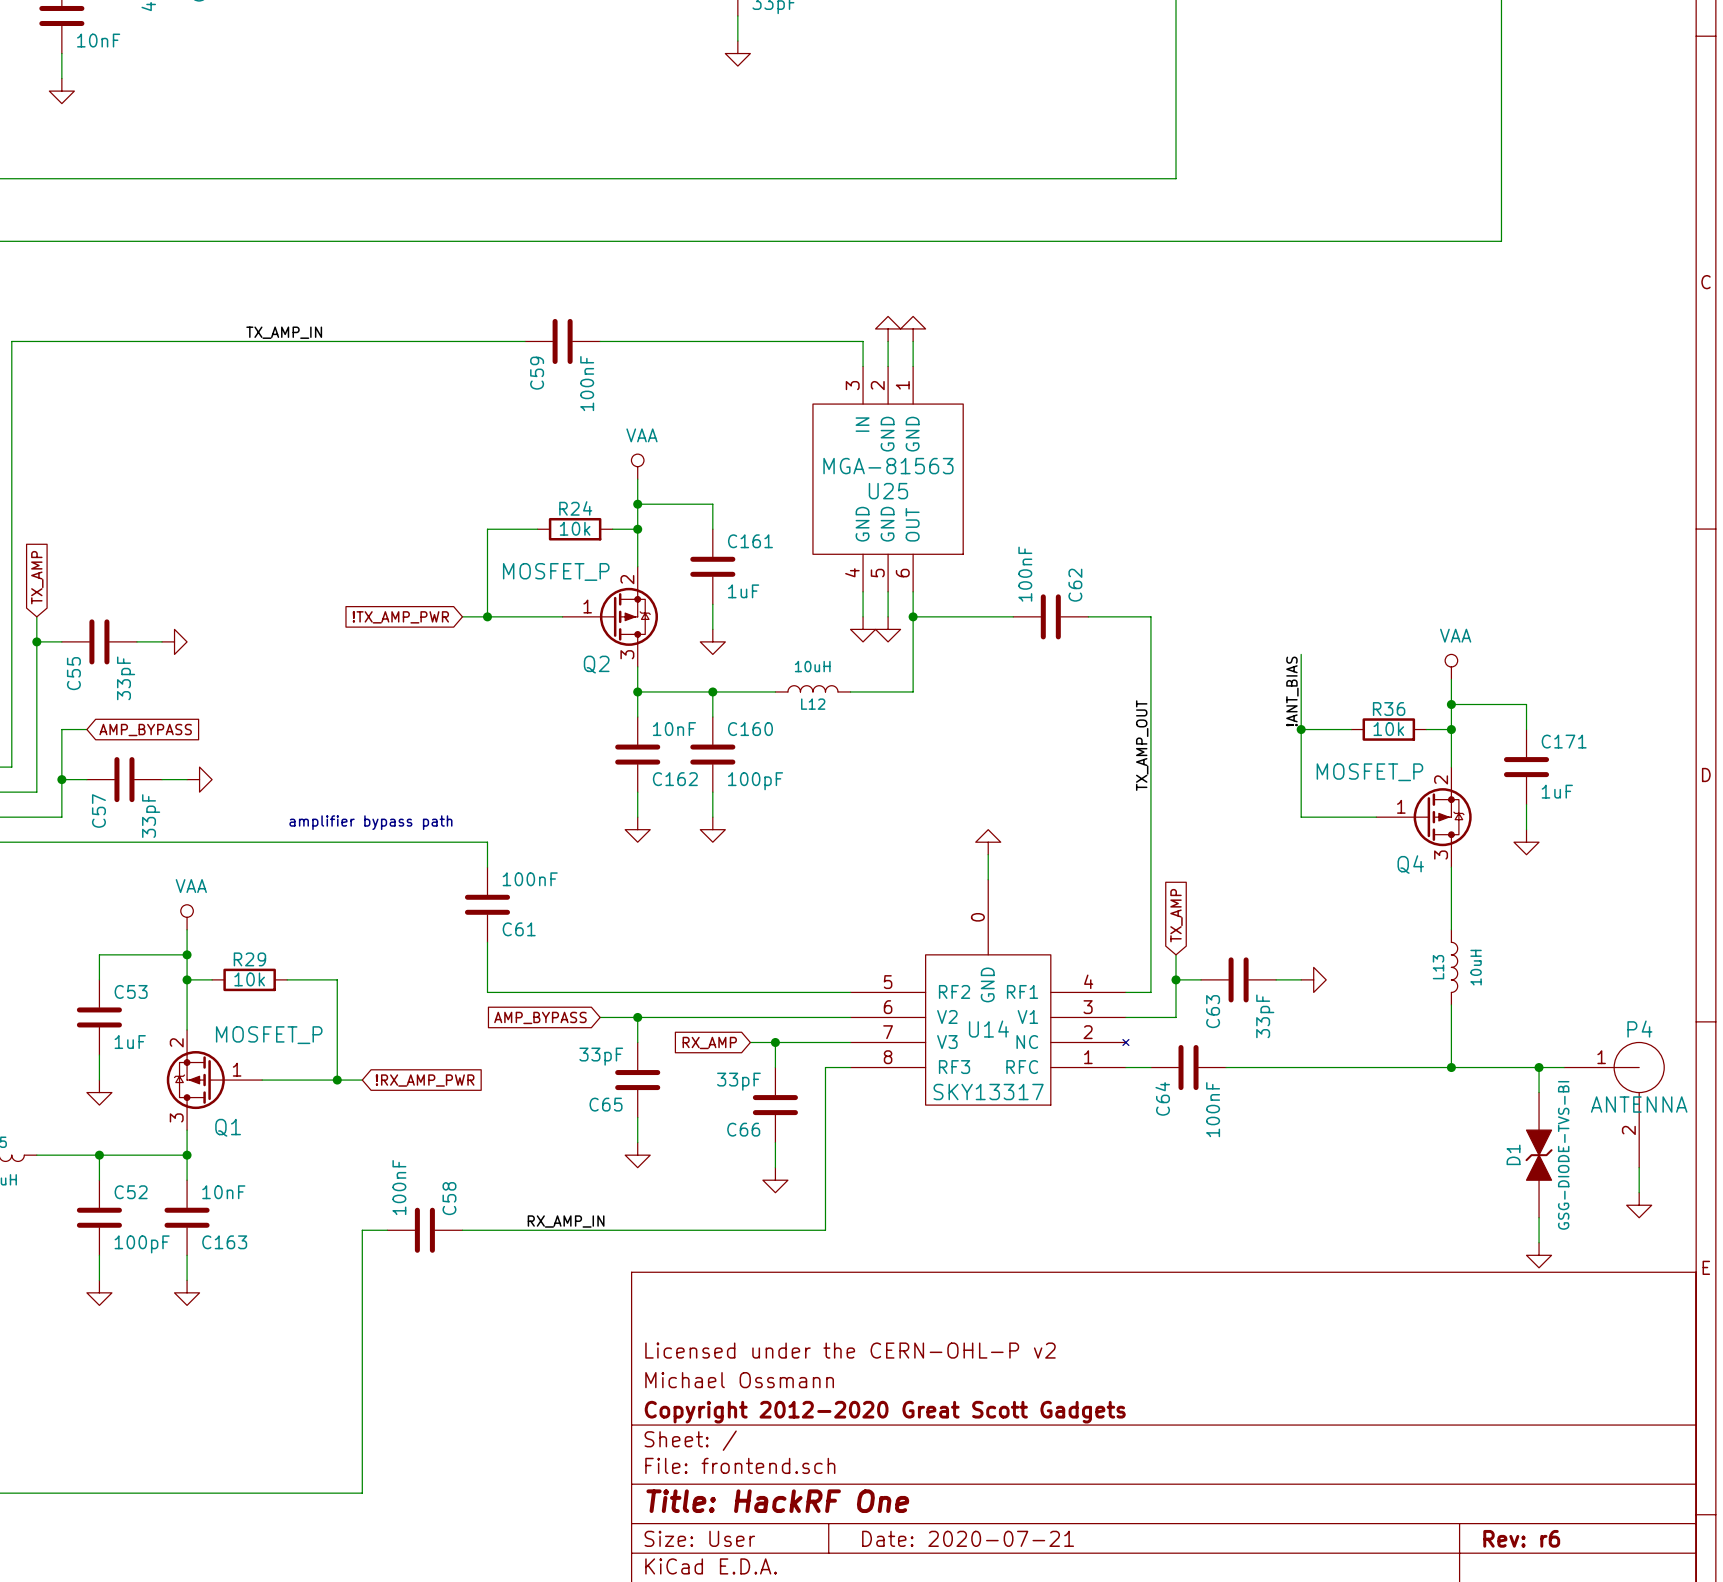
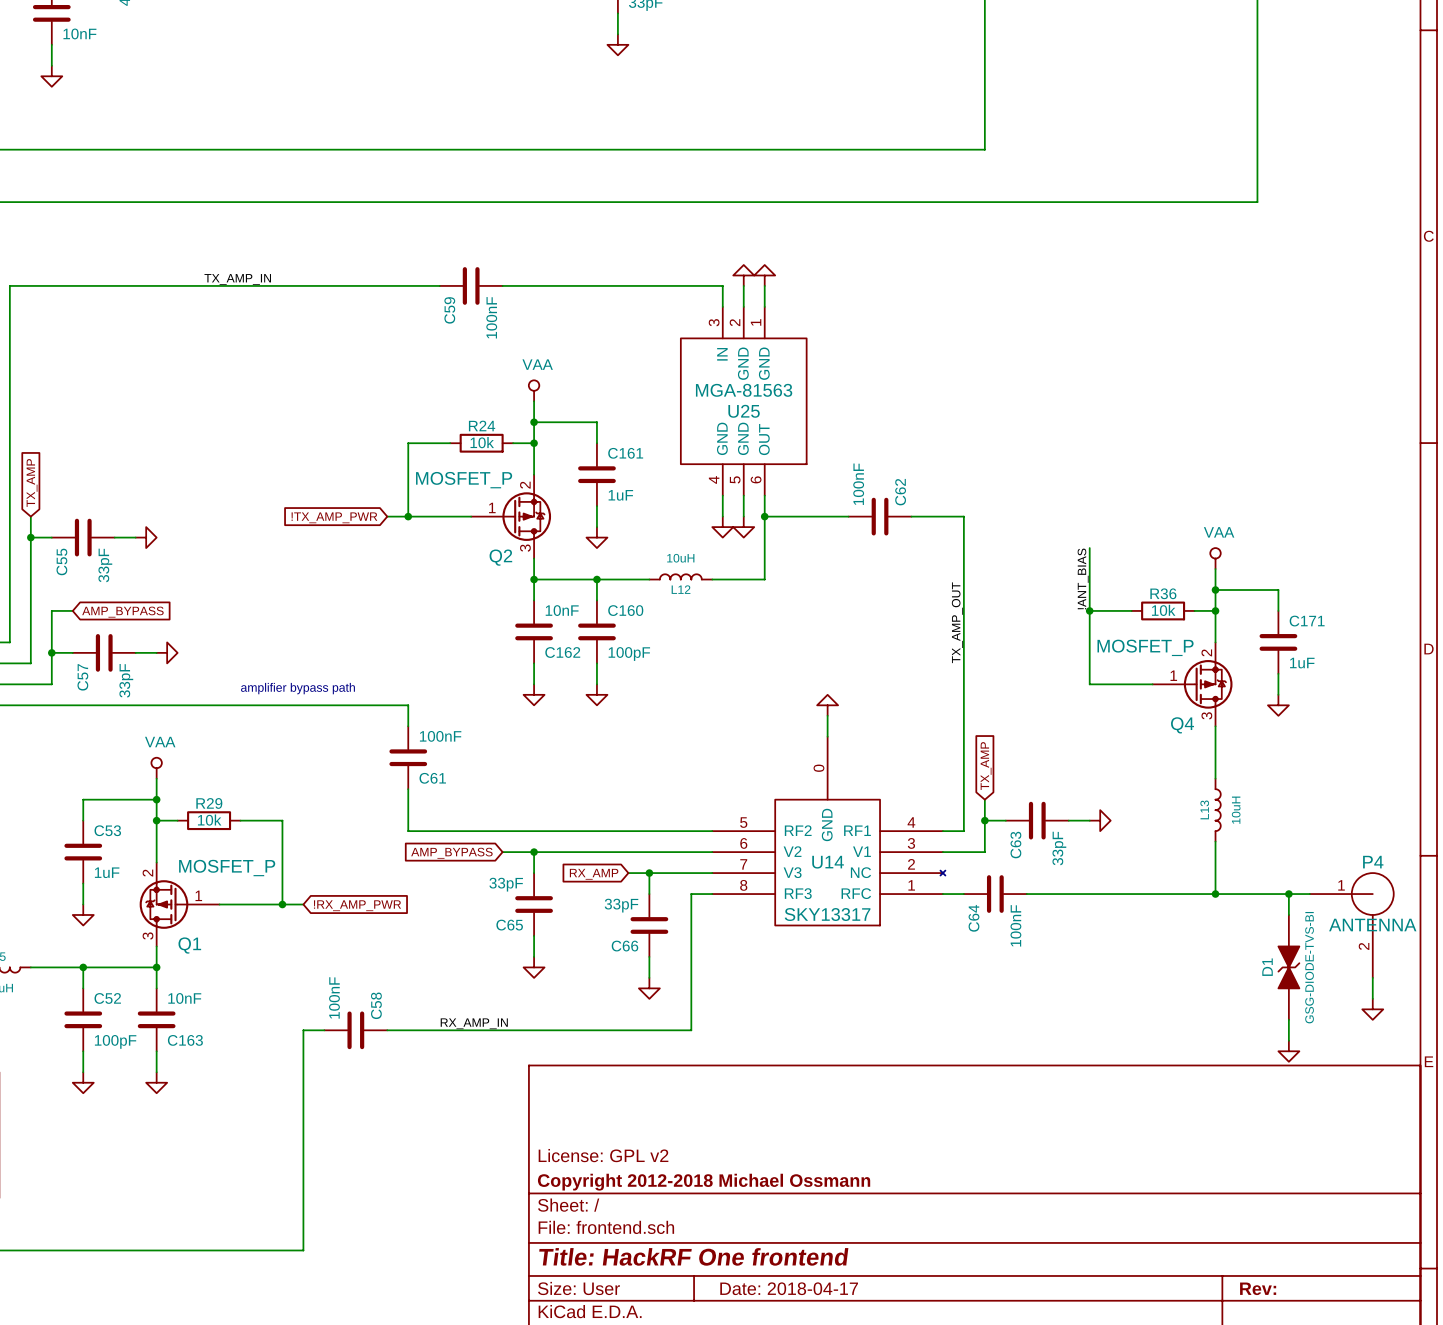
title block: Licensed under the CERN-OHL-P v2 (850, 1350) -> none
title block: Michael Ossmann (739, 1380) -> License: GPL v2 (603, 1155)
title block: Copyright 2012-2020 Great Scott Gadgets (885, 1412) -> Copyright 2012-2018 Michael Ossmann (704, 1182)
title block: Title: HackRF One (777, 1501) -> Title: HackRF One frontend (693, 1256)
title block: Date: 2020-07-21 (968, 1538) -> Date: 2018-04-17 (789, 1288)
title block: Rev: r6 (1521, 1538) -> Rev: (1258, 1288)

